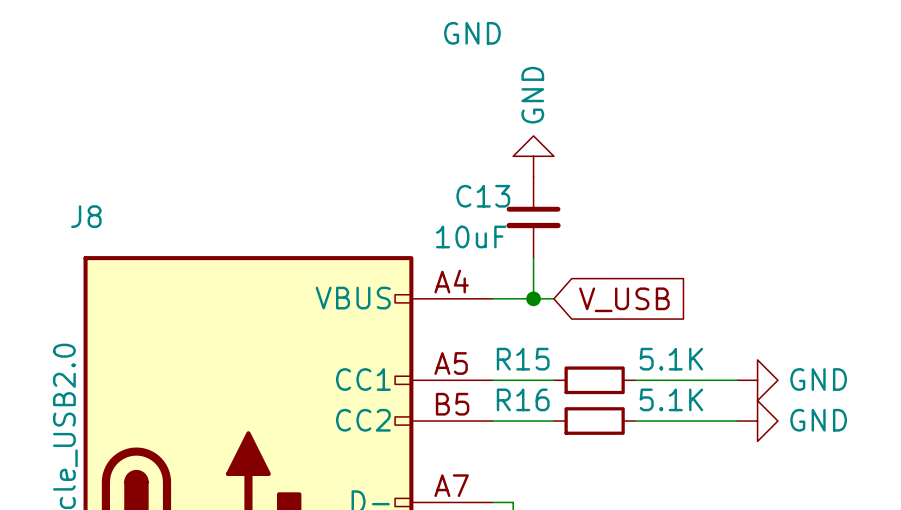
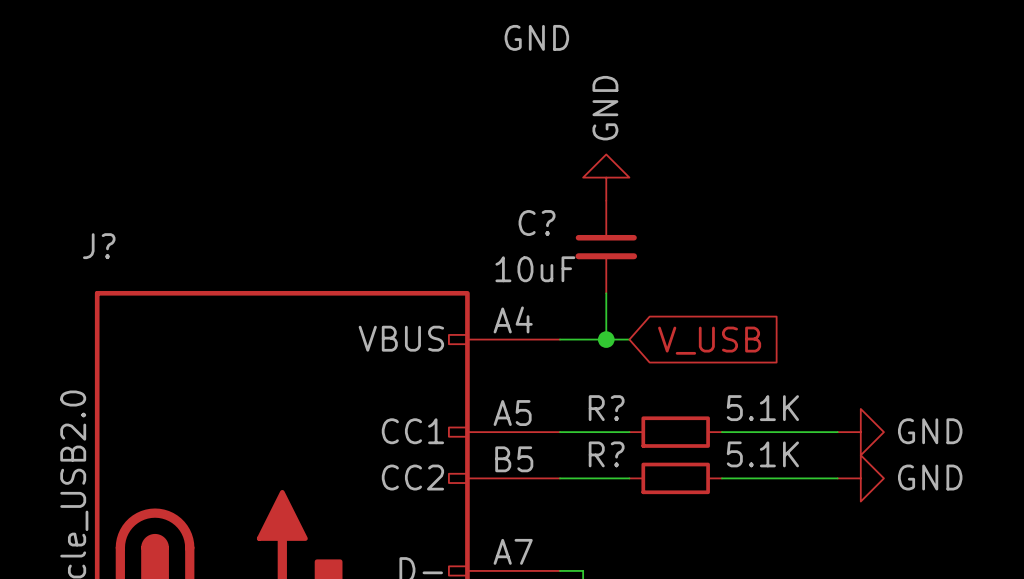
C13 name: C13 (483, 196) -> C? (537, 223)
J8 name: J8 (86, 216) -> J? (99, 246)
R15 name: R15 (523, 359) -> R? (606, 408)
R16 name: R16 (523, 399) -> R? (606, 454)

